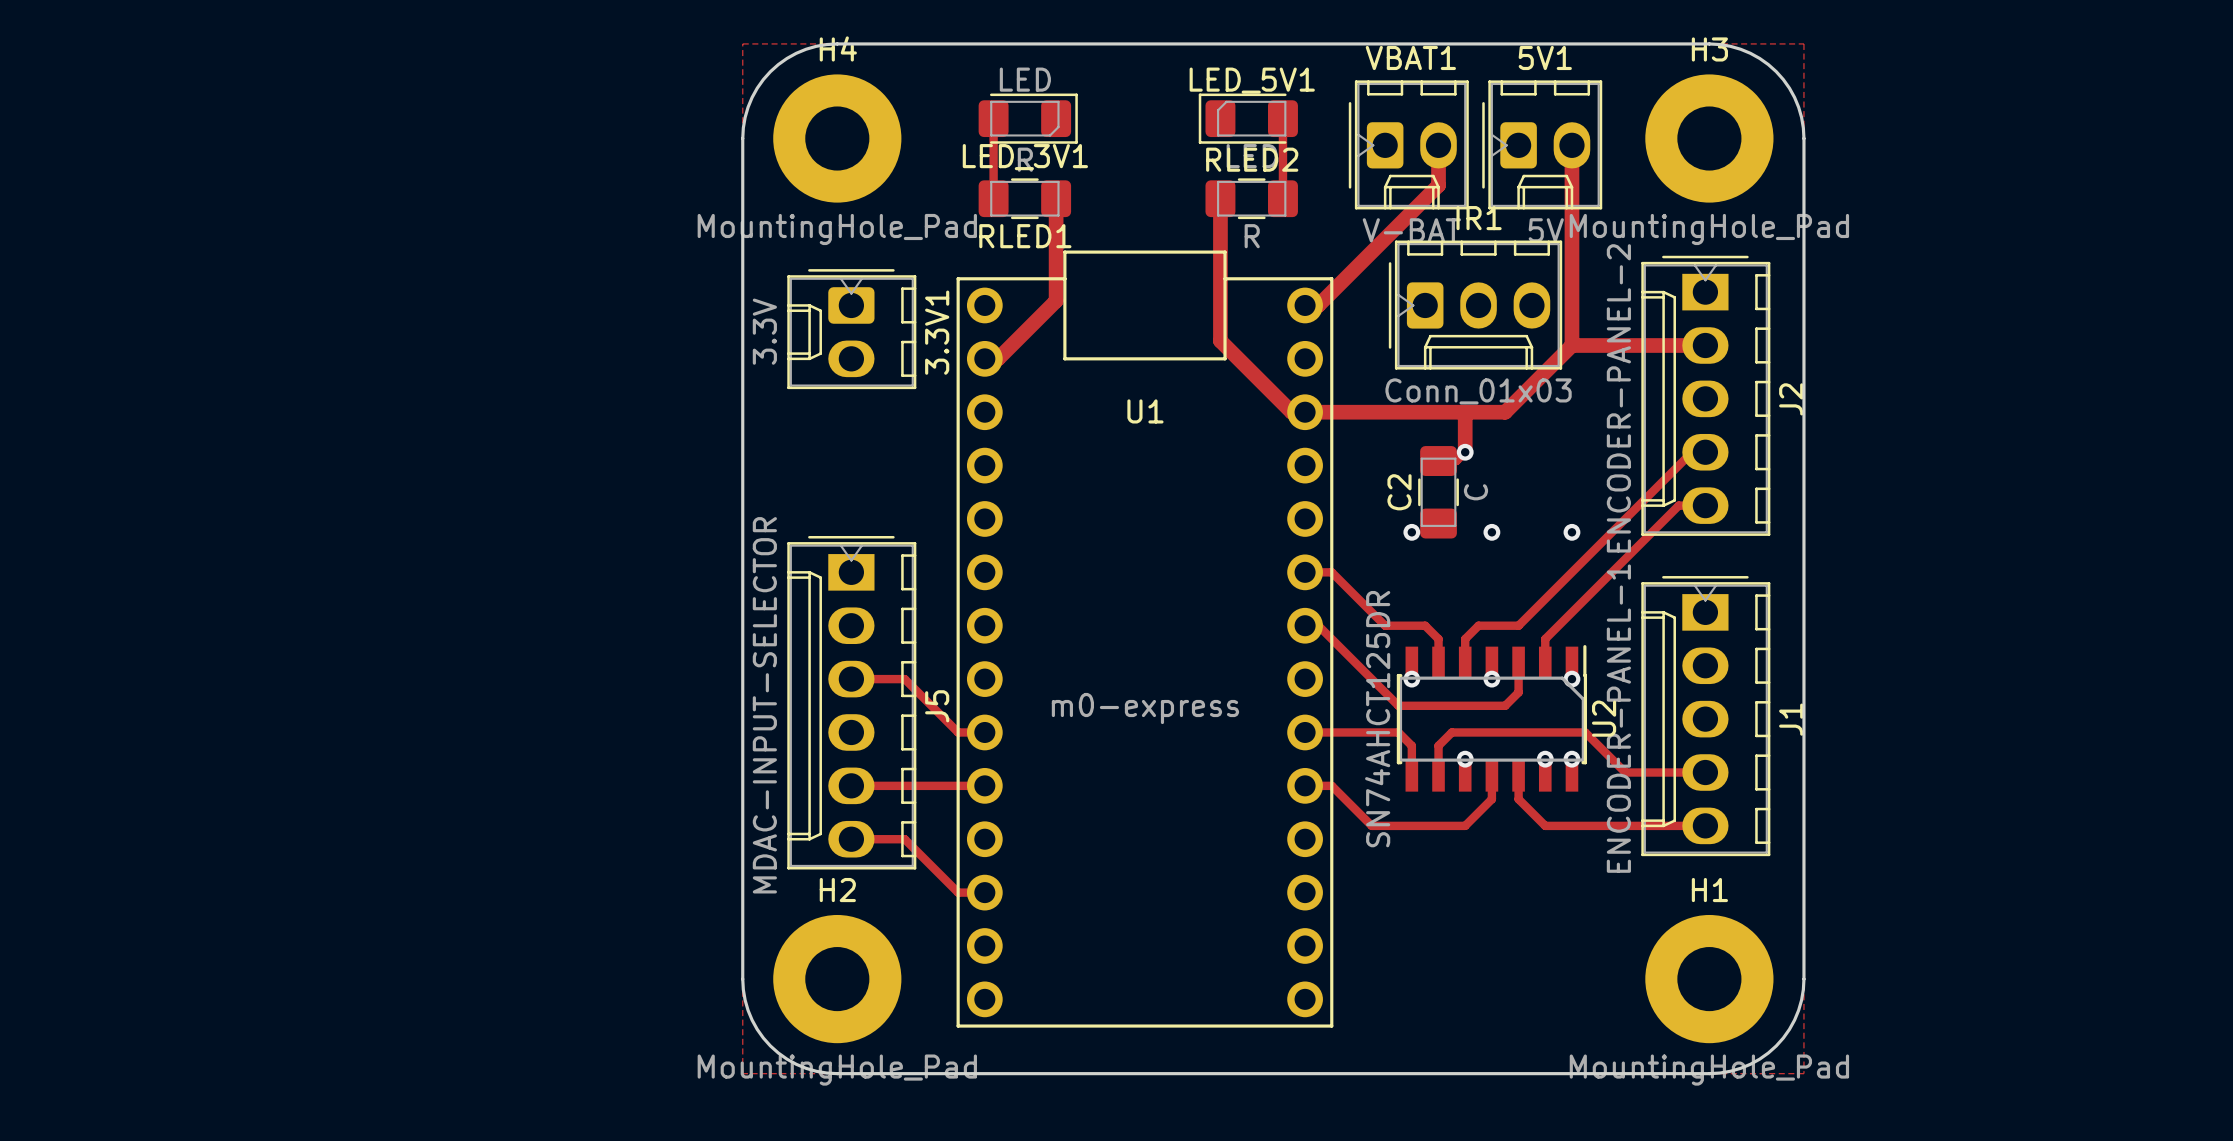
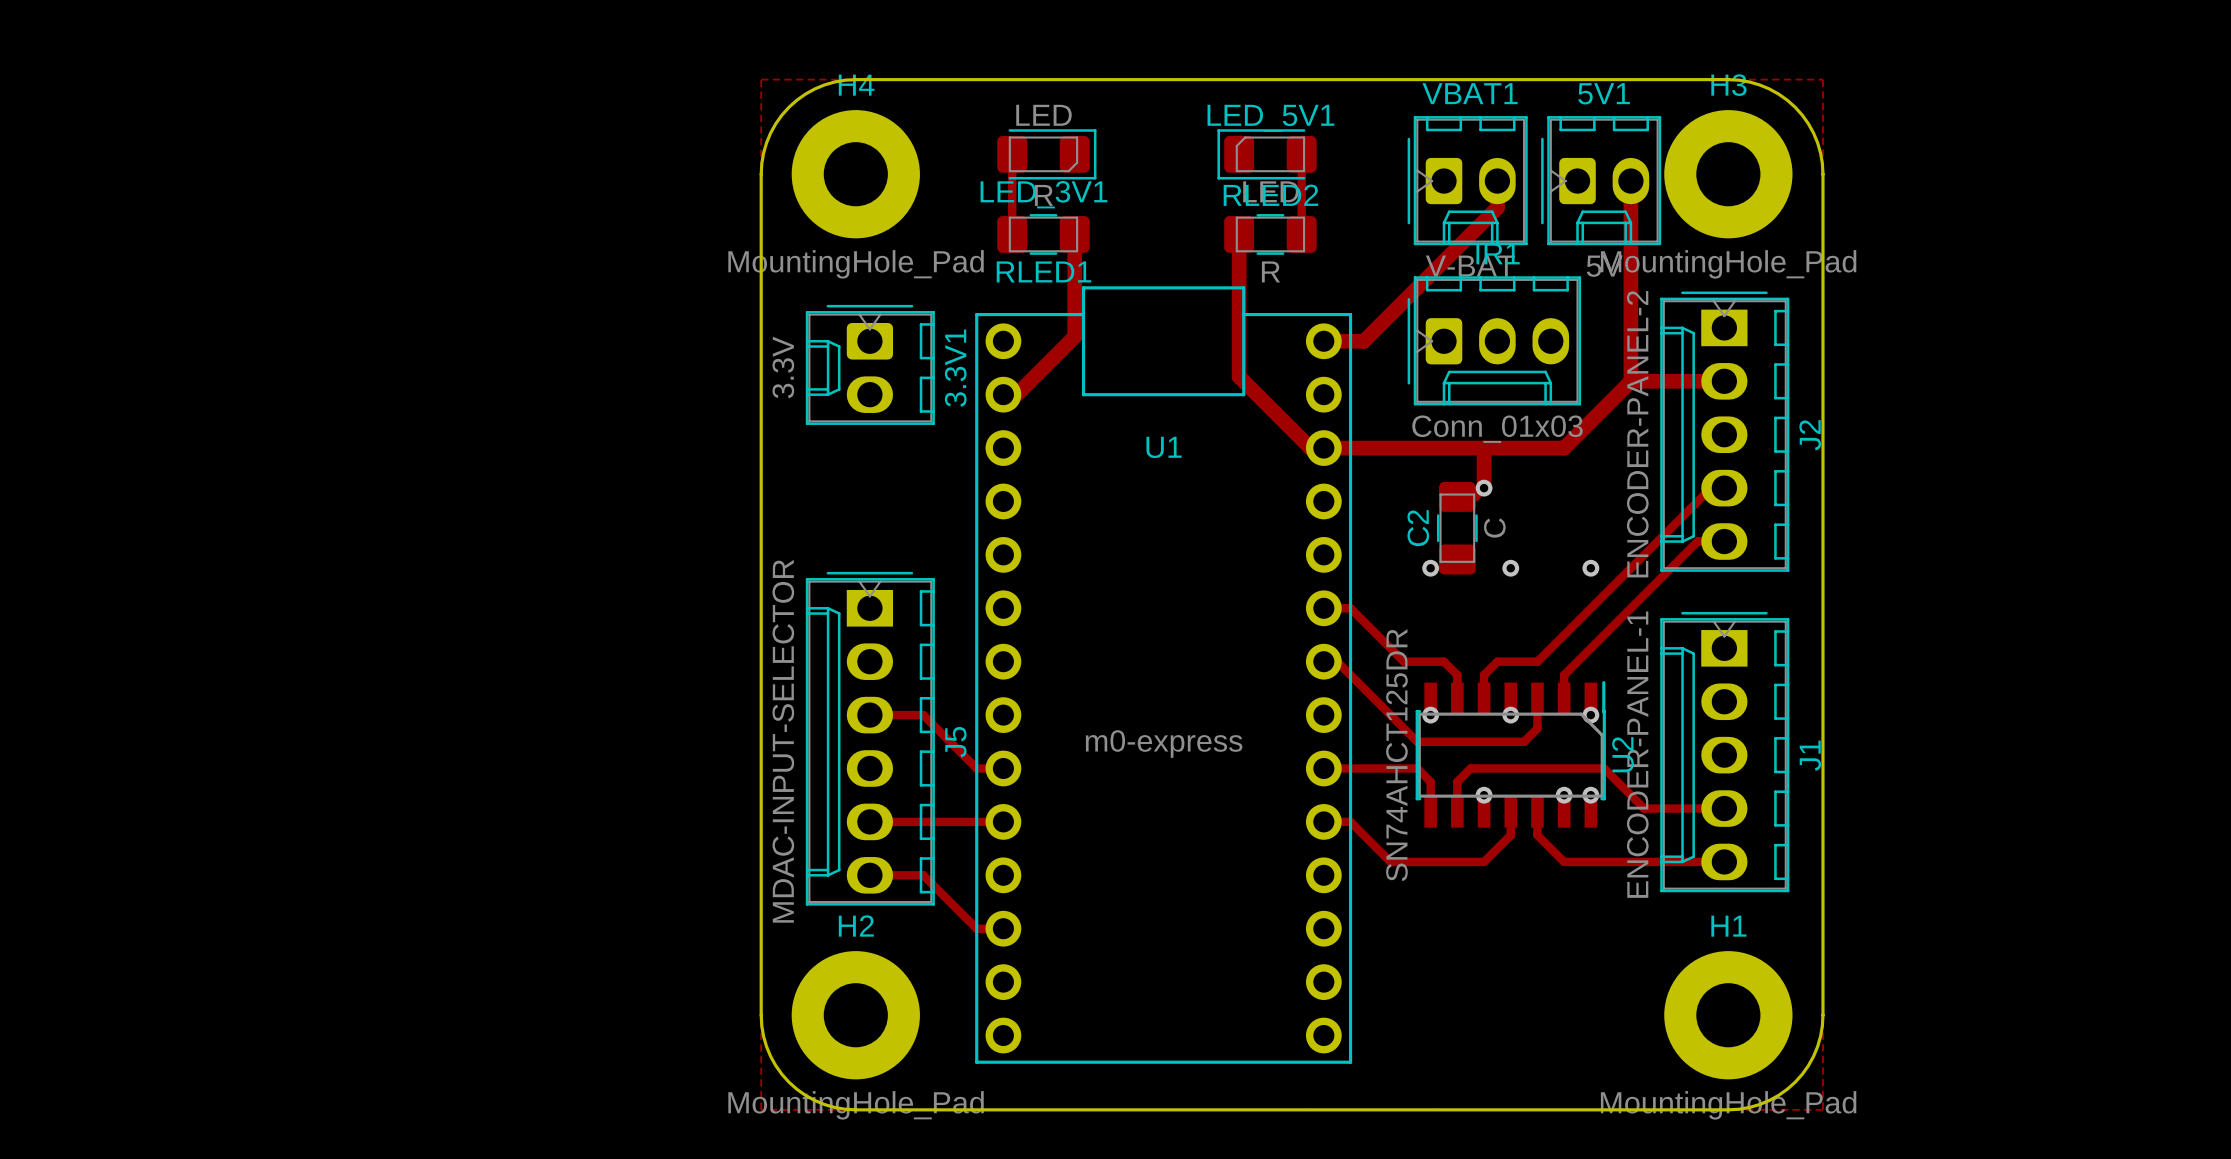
VBAT1 position: (1408, 144) -> (1467, 180)
5V1 position: (1542, 144) -> (1601, 180)
track: (1438, 145) (1438, 185) (1318, 305) -> (1497, 181) (1497, 207) (1363, 341) (1337, 341)
track: (1571, 145) (1571, 345) -> none
track: (1571, 345) (1505, 412) -> (1630, 181) (1630, 381) (1564, 448) (1524, 448)
track: (1571, 345) (1612, 345) -> none

